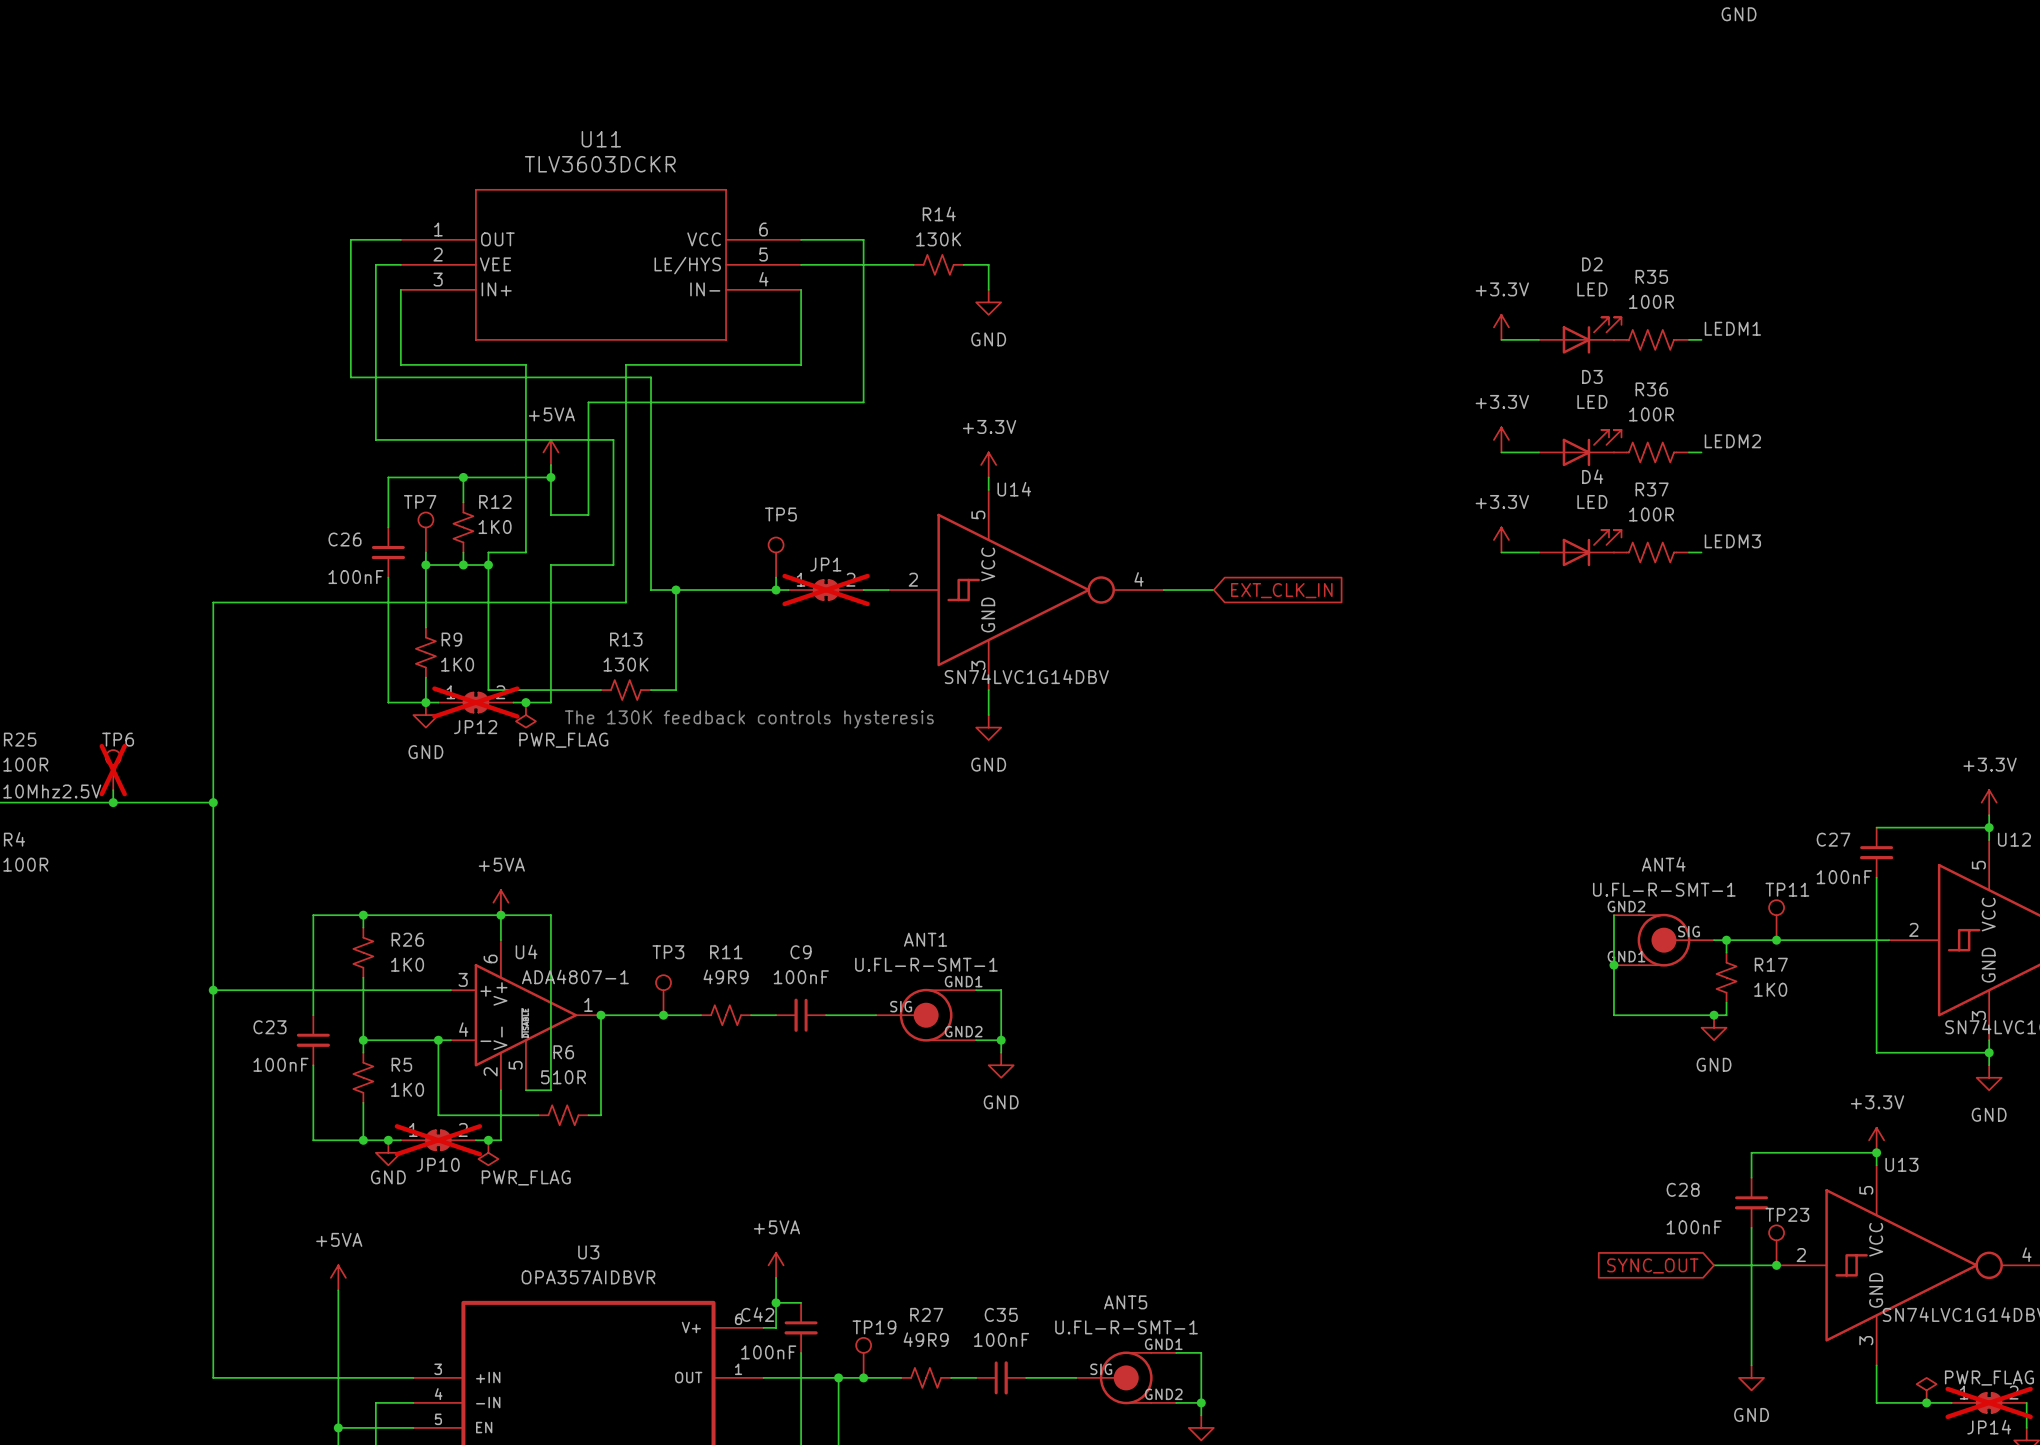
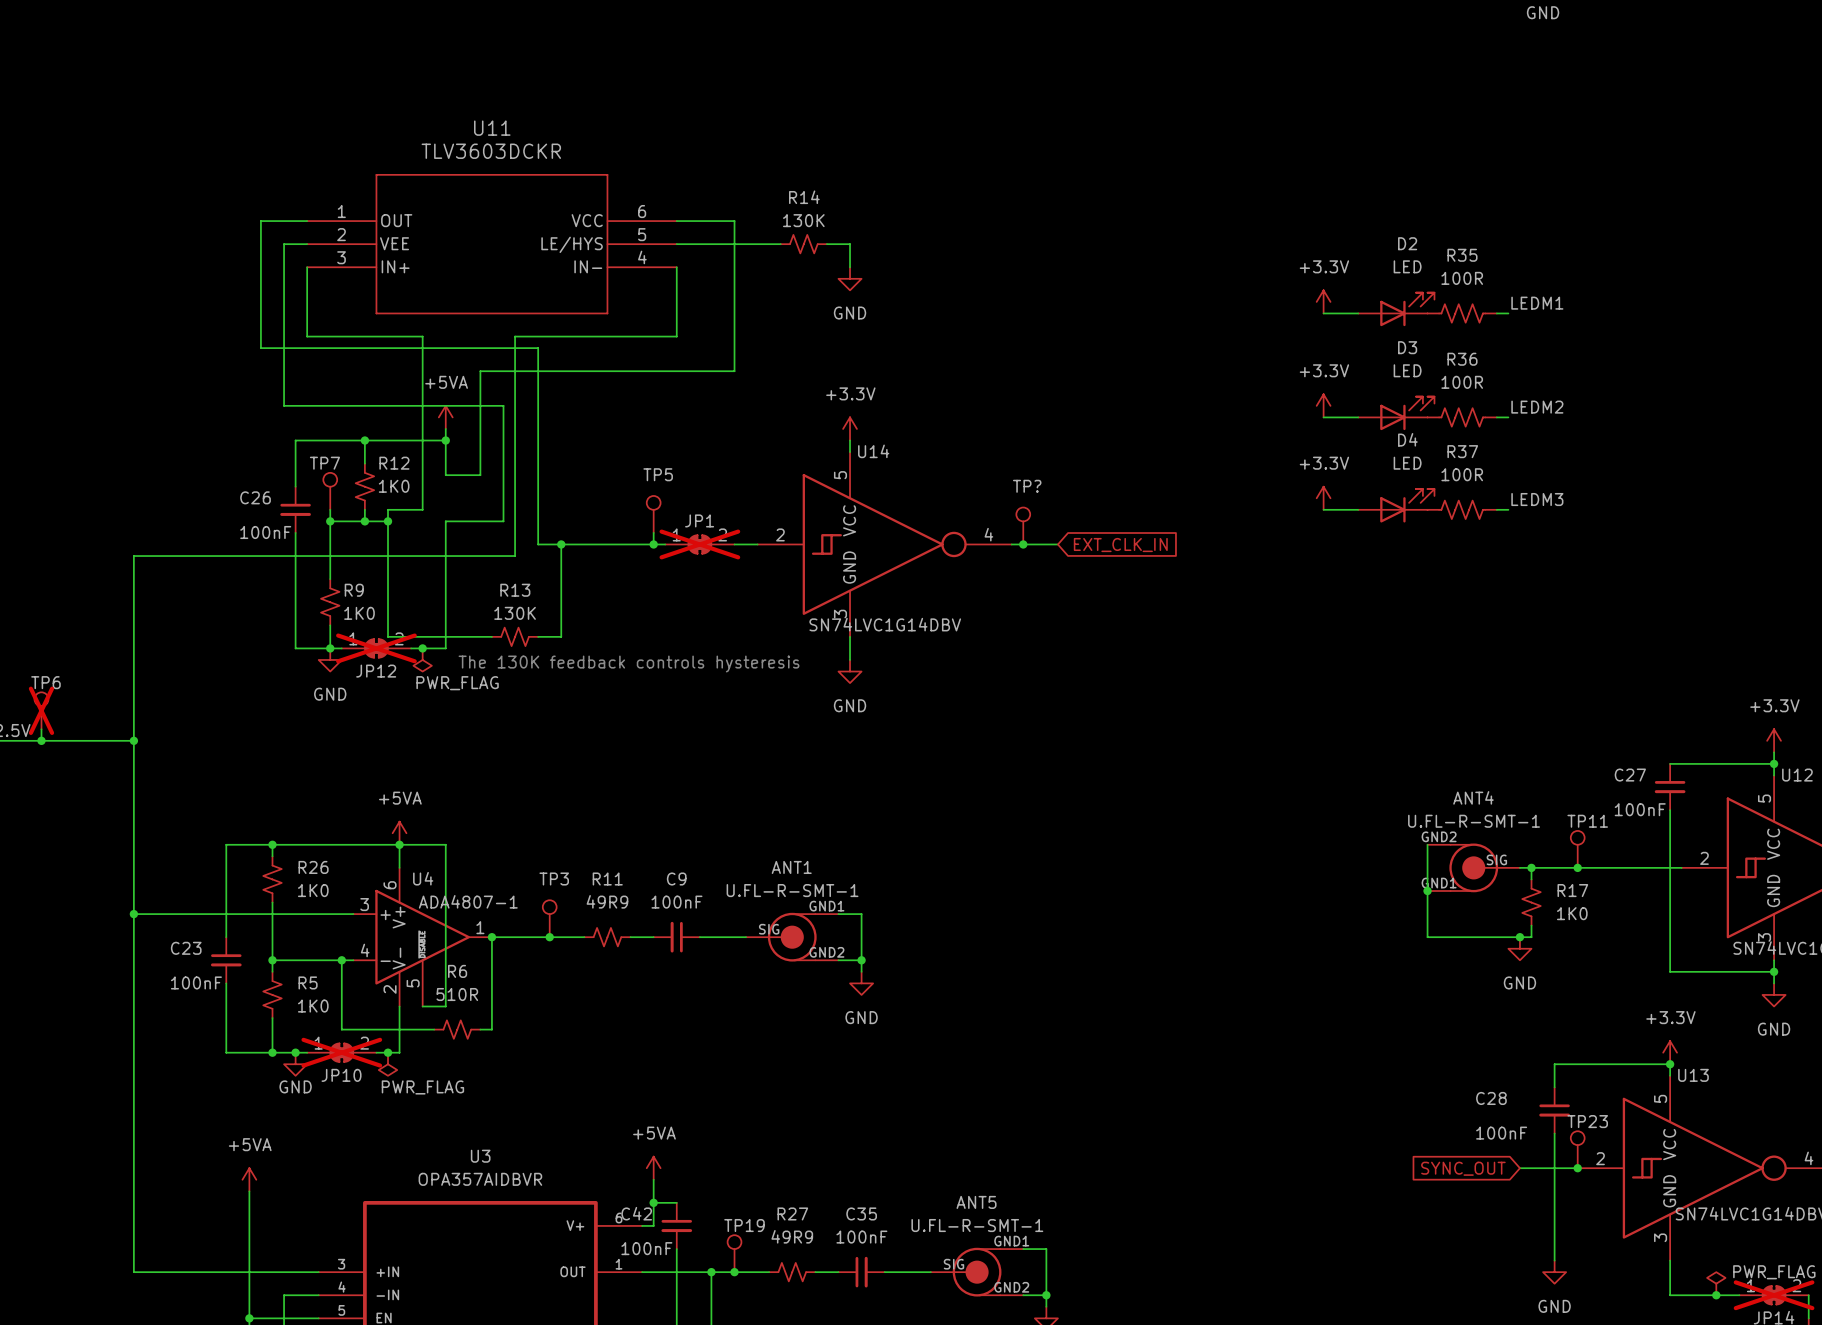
TP?: none -> (1023, 525)
junction: none -> (1023, 544)

